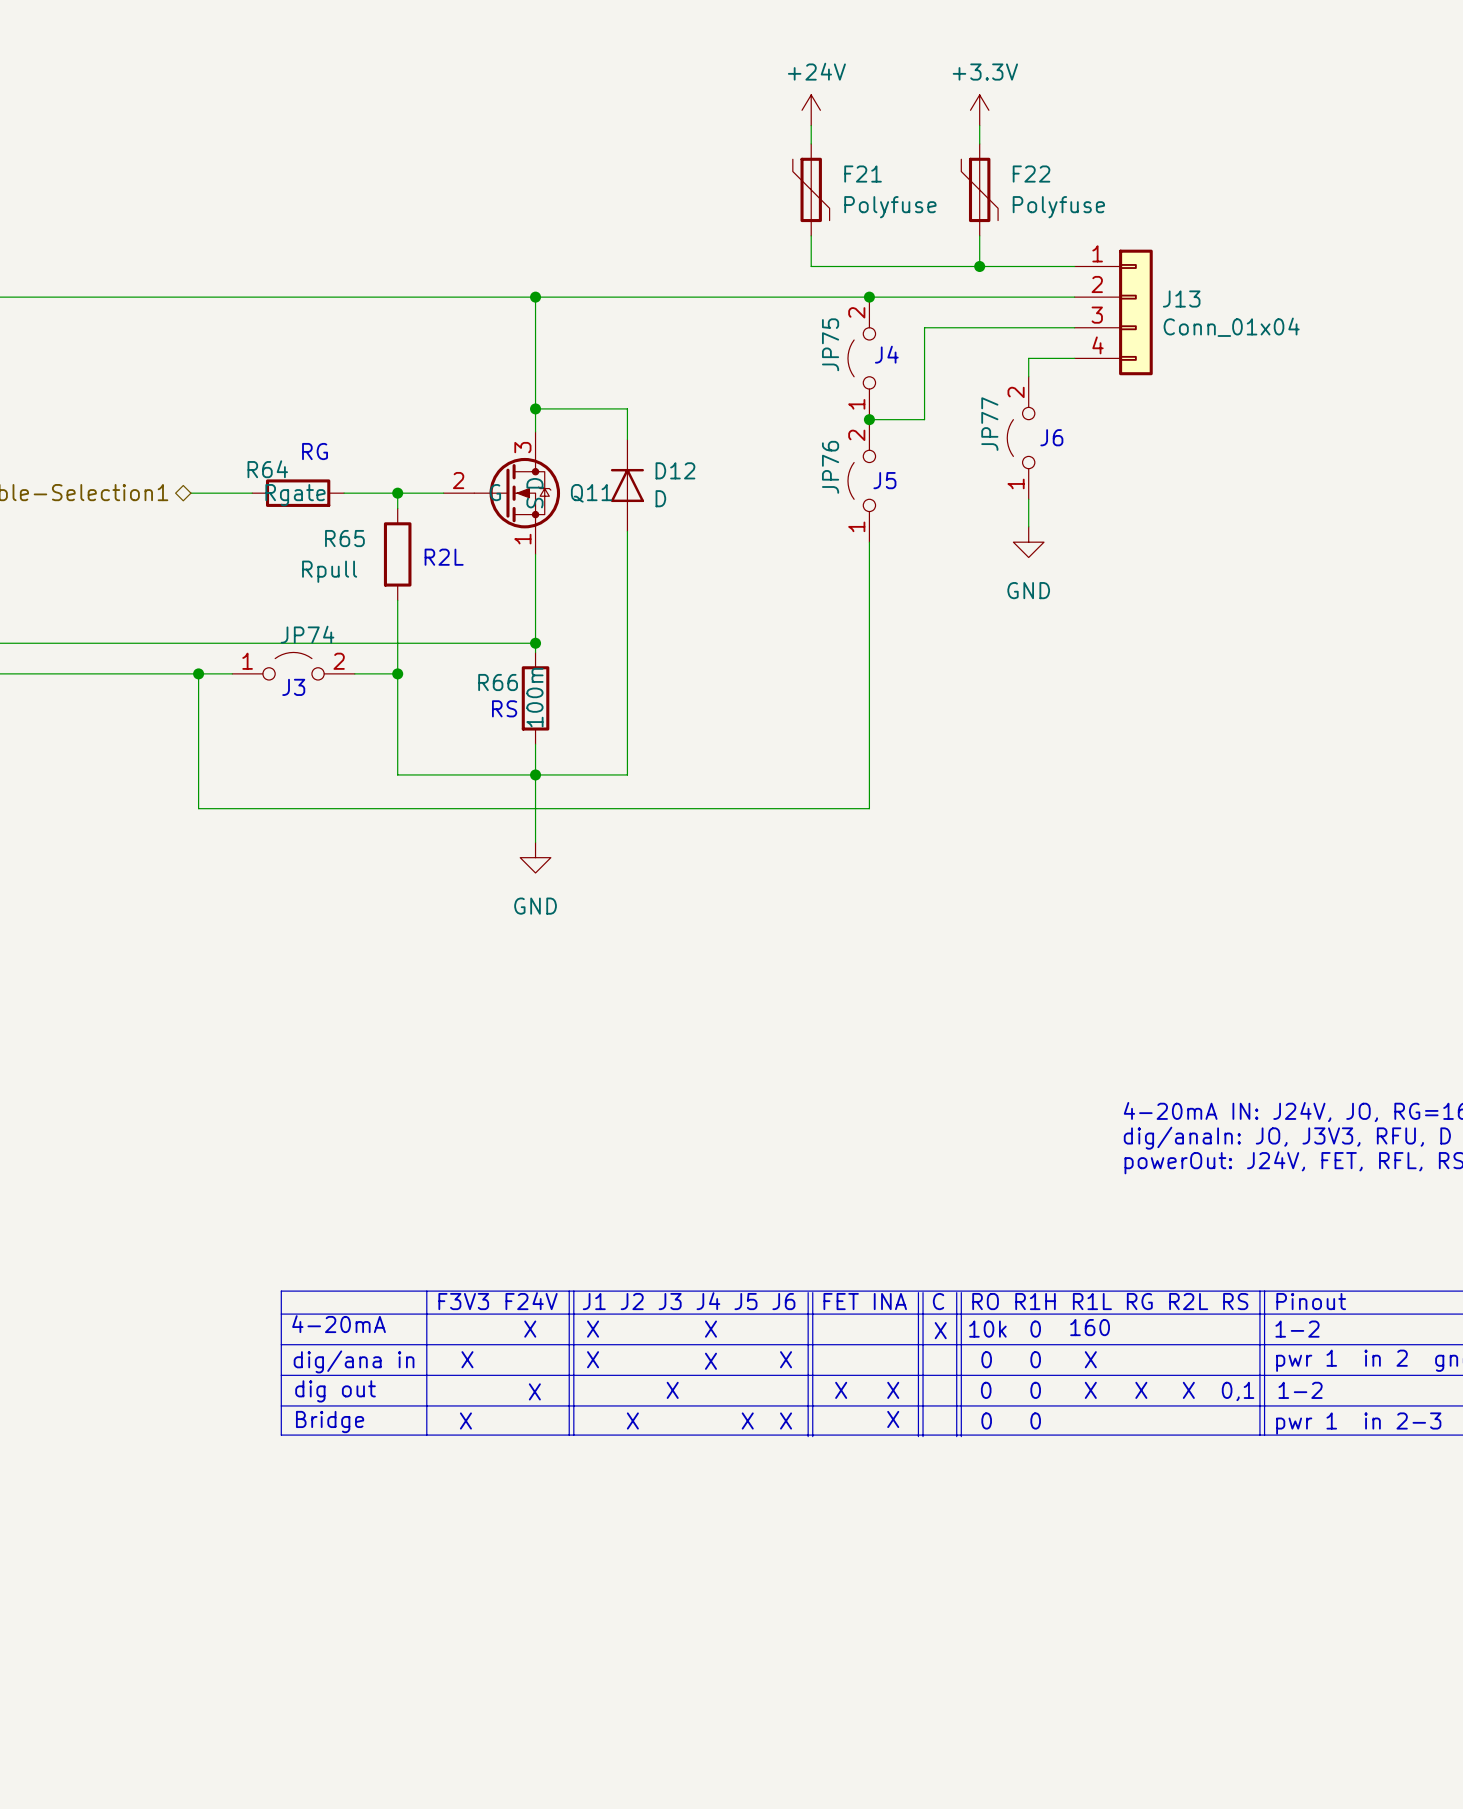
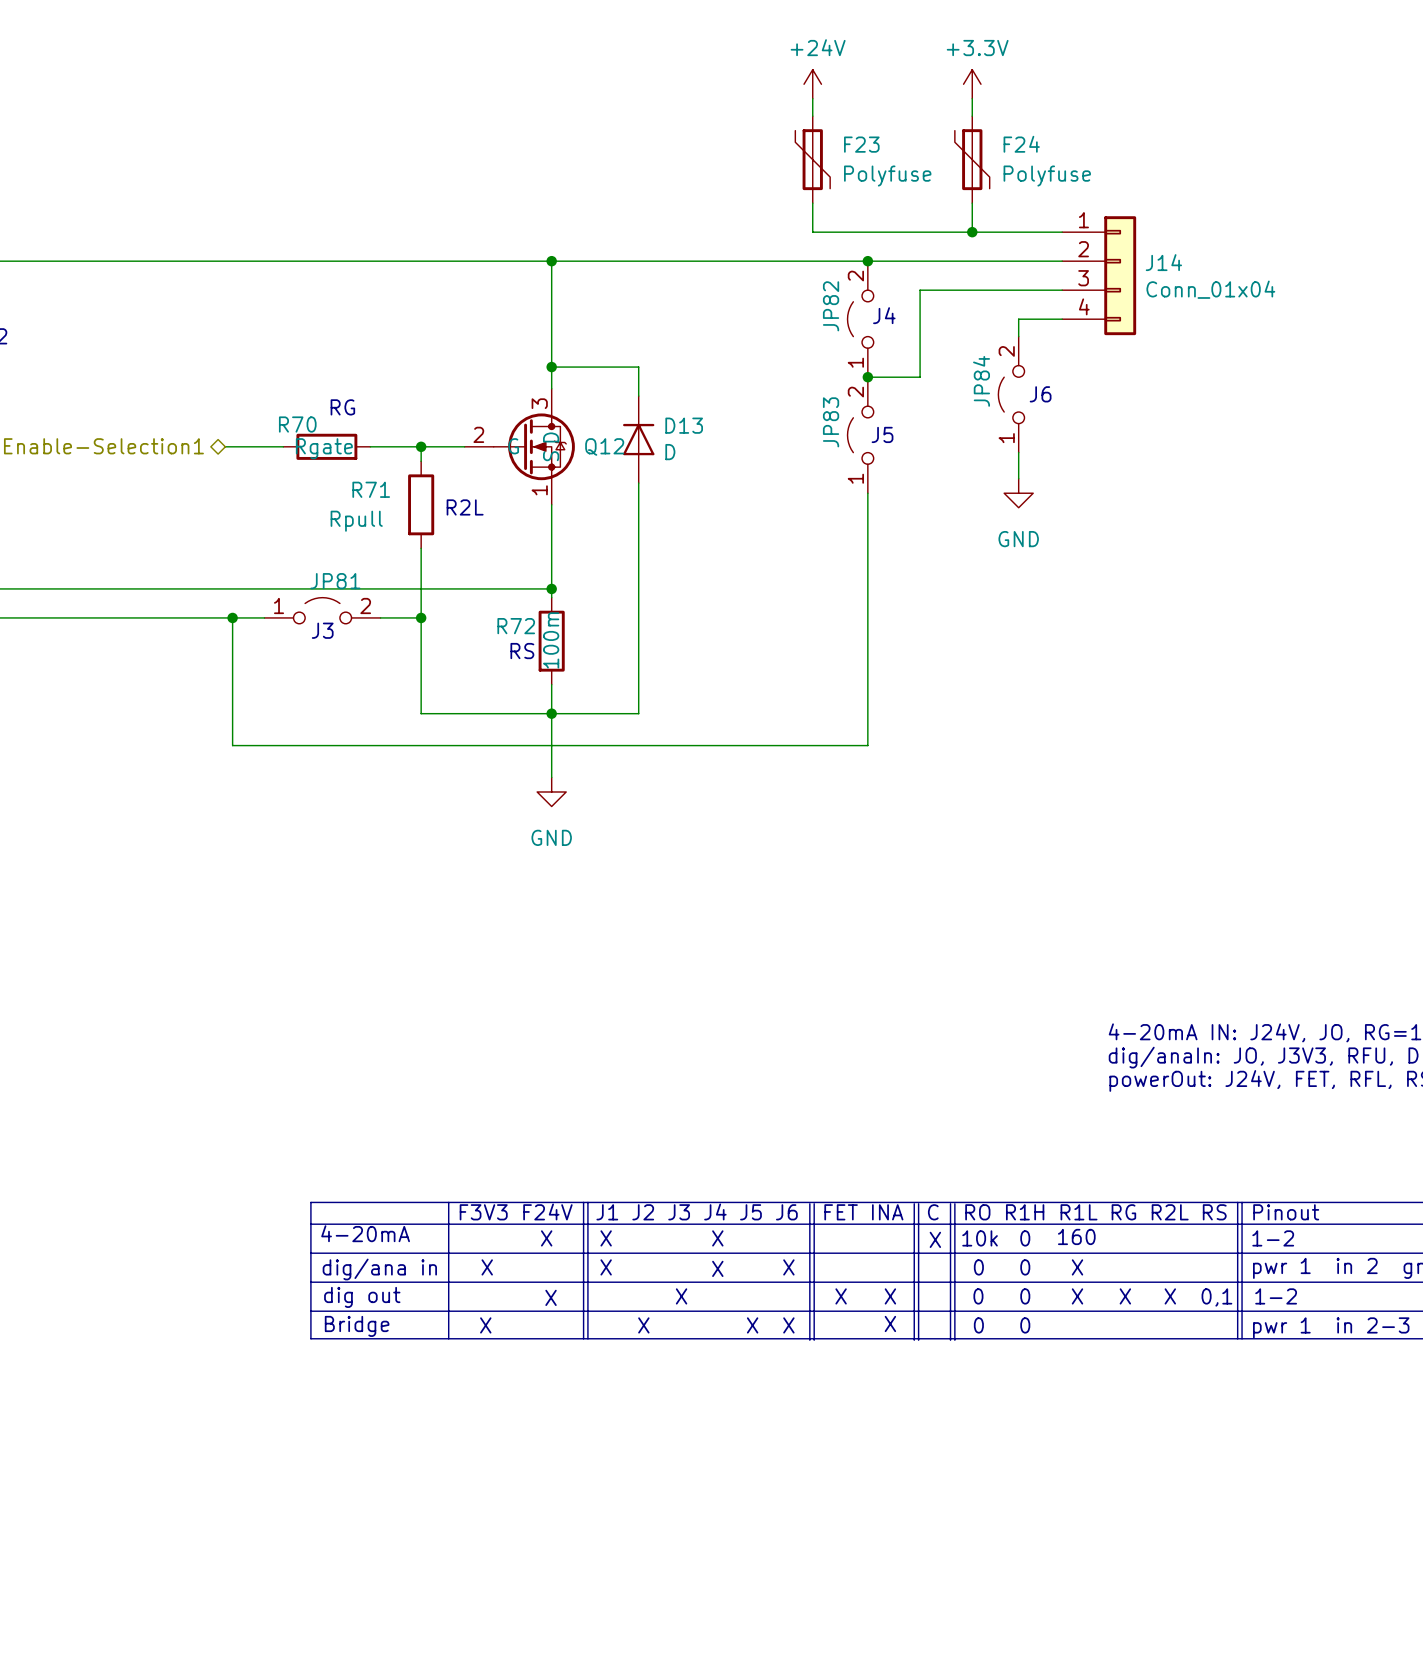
F21 name: F21 (863, 174) -> F23 (861, 144)
F22 name: F22 (1031, 174) -> F24 (1021, 144)
J13 name: J13 (1181, 299) -> J14 (1163, 262)
JP75 name: JP75 (830, 344) -> JP82 (831, 306)
JP77 name: JP77 (989, 424) -> JP84 (981, 381)
JP76 name: JP76 (830, 467) -> JP83 (831, 422)
R64 name: R64 (267, 469) -> R70 (297, 424)
D12 name: D12 (675, 470) -> D13 (684, 425)
Q11 name: Q11 (591, 493) -> Q12 (604, 446)
R65 name: R65 (344, 538) -> R71 (371, 489)
JP74 name: JP74 (307, 634) -> JP81 (335, 581)
R66 name: R66 (498, 682) -> R72 (516, 626)

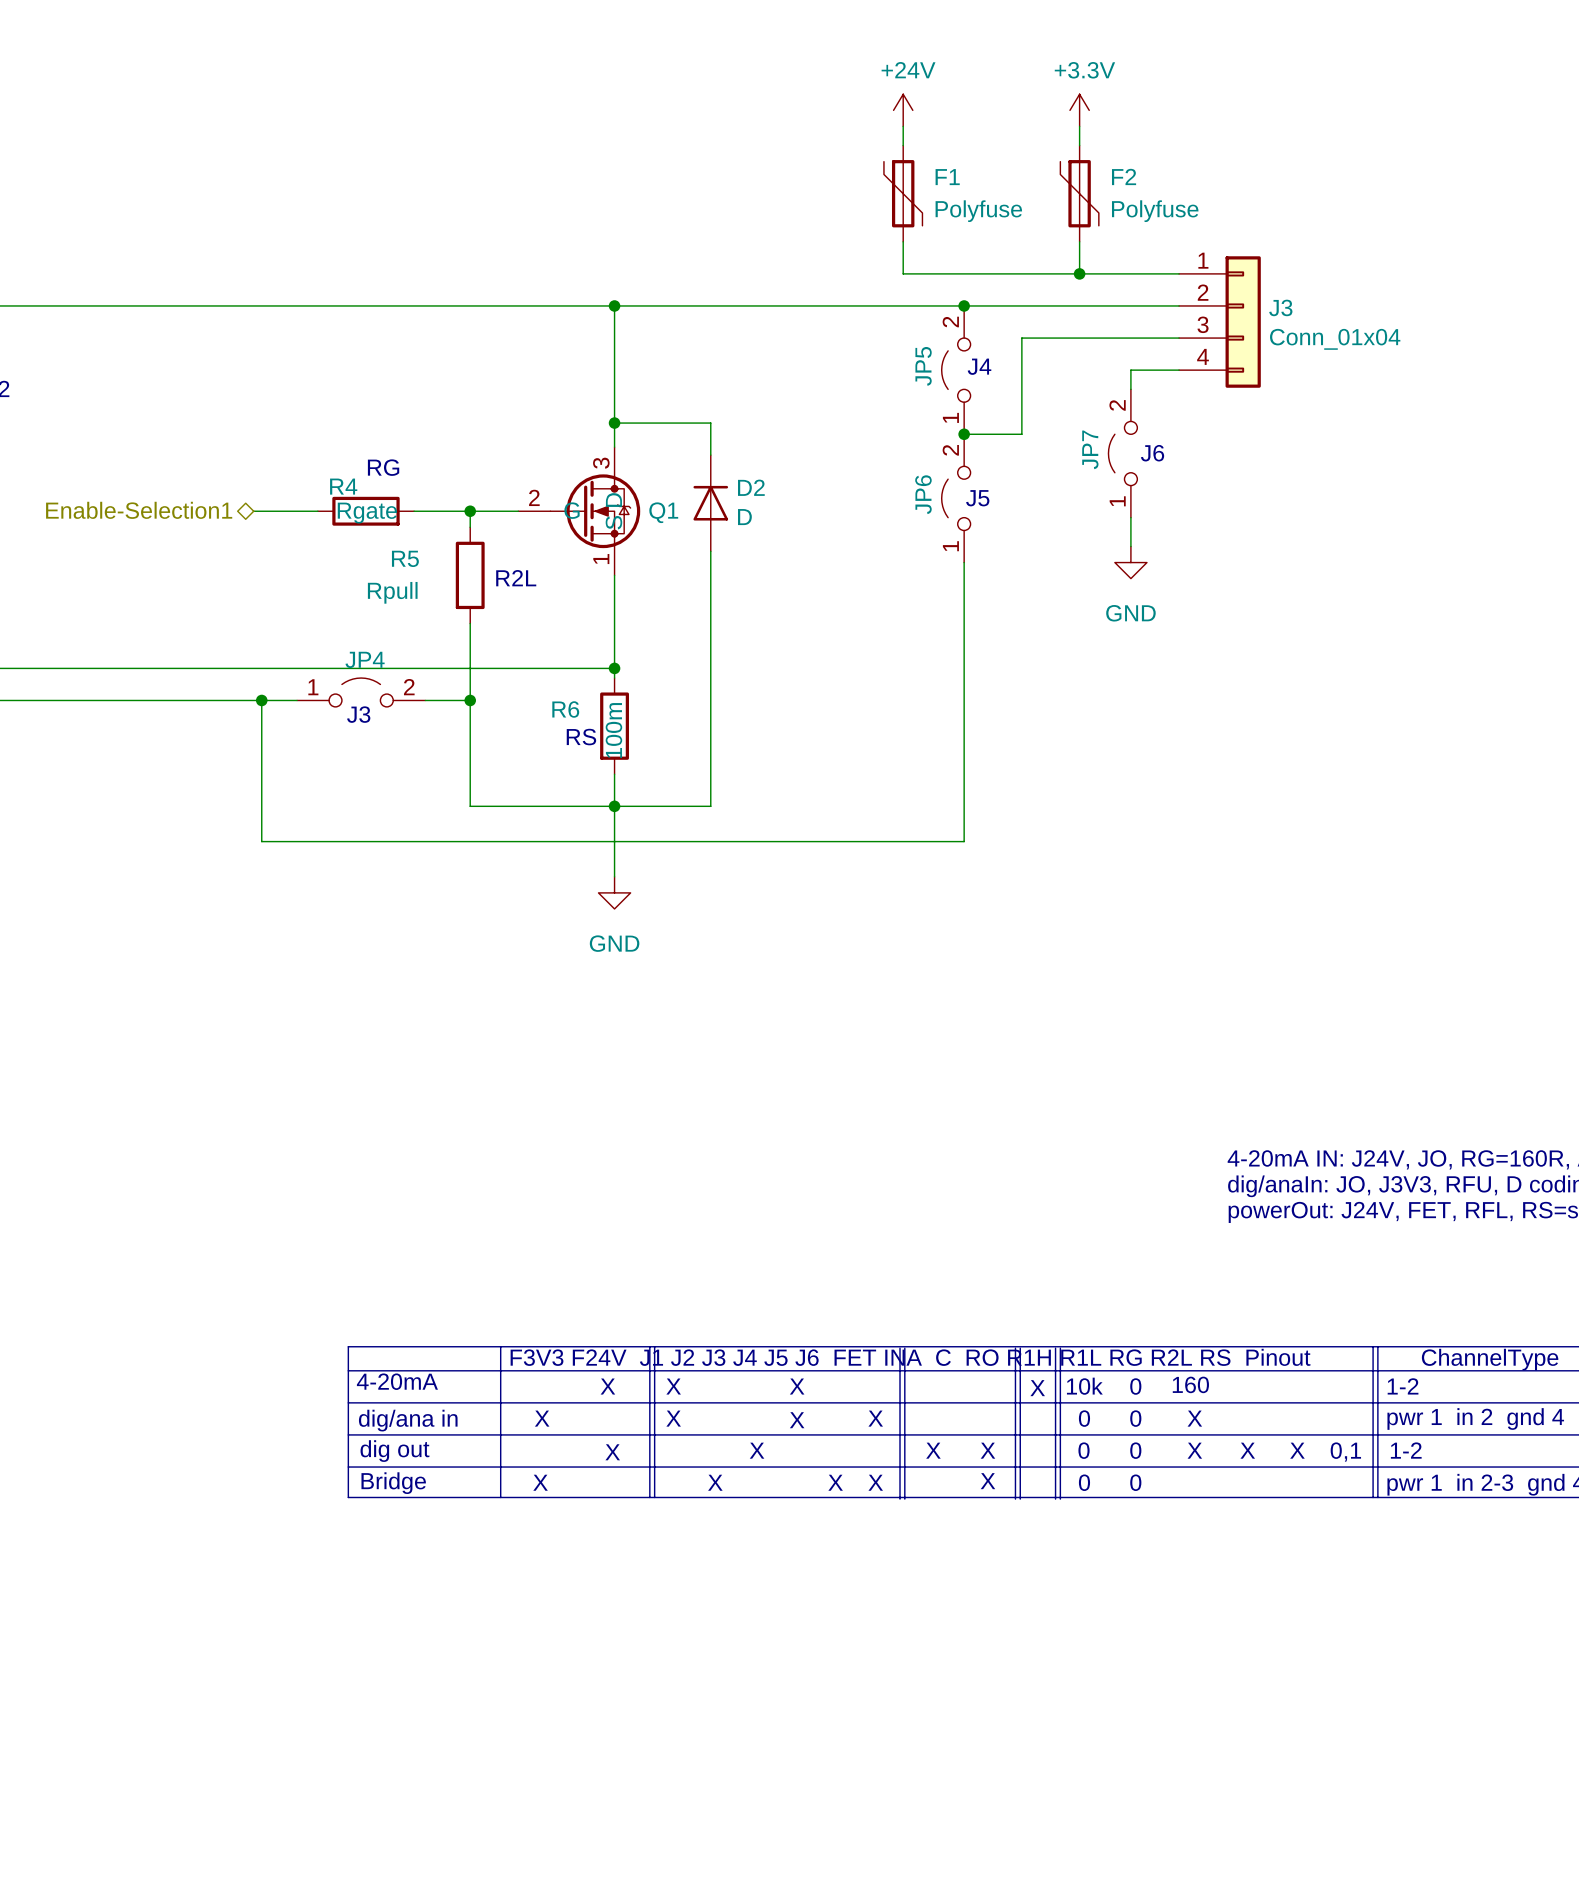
F23 name: F23 (861, 144) -> F1 (947, 177)
F24 name: F24 (1021, 144) -> F2 (1124, 176)
J14 name: J14 (1163, 262) -> J3 (1280, 307)
JP82 name: JP82 (831, 306) -> JP5 (923, 366)
JP84 name: JP84 (981, 381) -> JP7 (1090, 449)
JP83 name: JP83 (831, 422) -> JP6 (923, 494)
R70 name: R70 (297, 424) -> R4 (343, 486)
D13 name: D13 (684, 425) -> D2 (751, 487)
Q12 name: Q12 (604, 446) -> Q1 (663, 512)
R71 name: R71 (371, 489) -> R5 (405, 558)
JP81 name: JP81 (335, 581) -> JP4 (365, 659)
R72 name: R72 (516, 626) -> R6 (565, 709)

